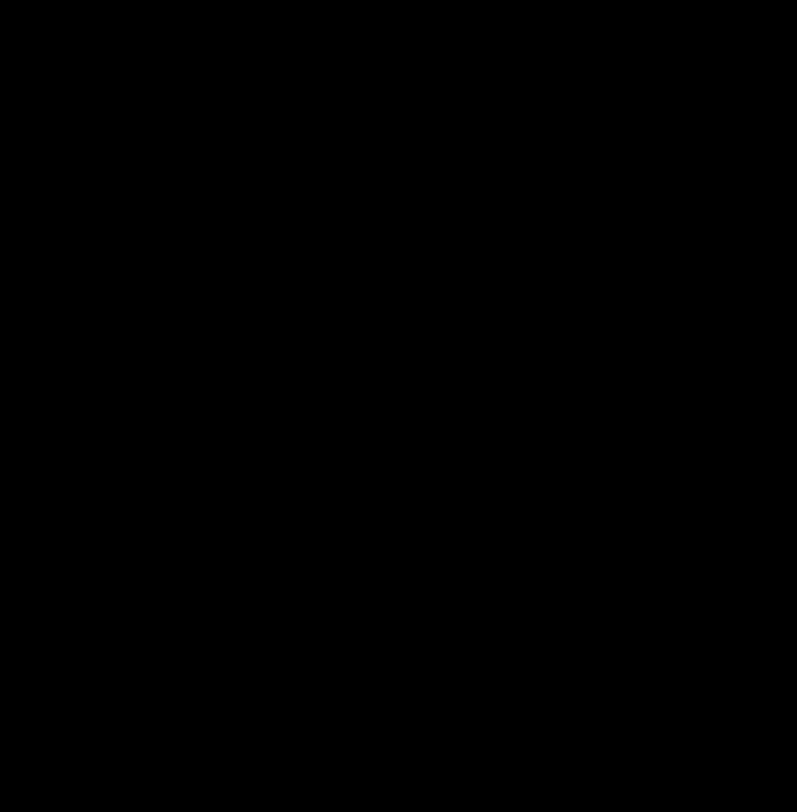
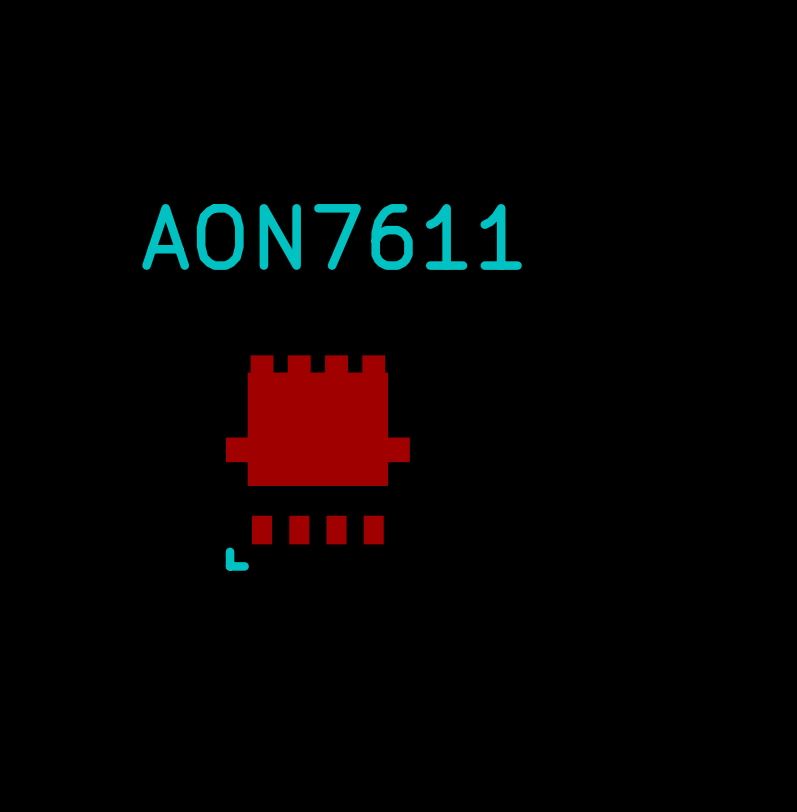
part: none -> AON7611 (317, 463)

